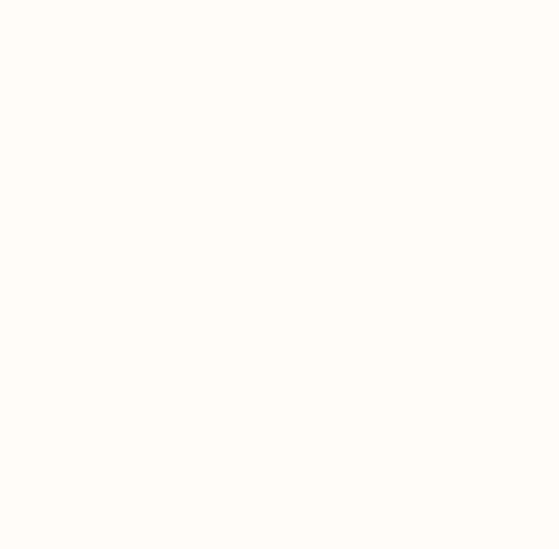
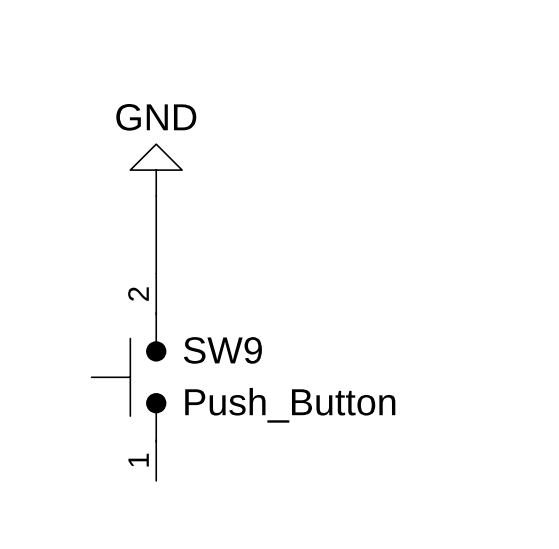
power symbol: none -> GND (156, 170)
wire: none -> (156, 195) (156, 273)
SW9: none -> Push_Button (128, 377)

